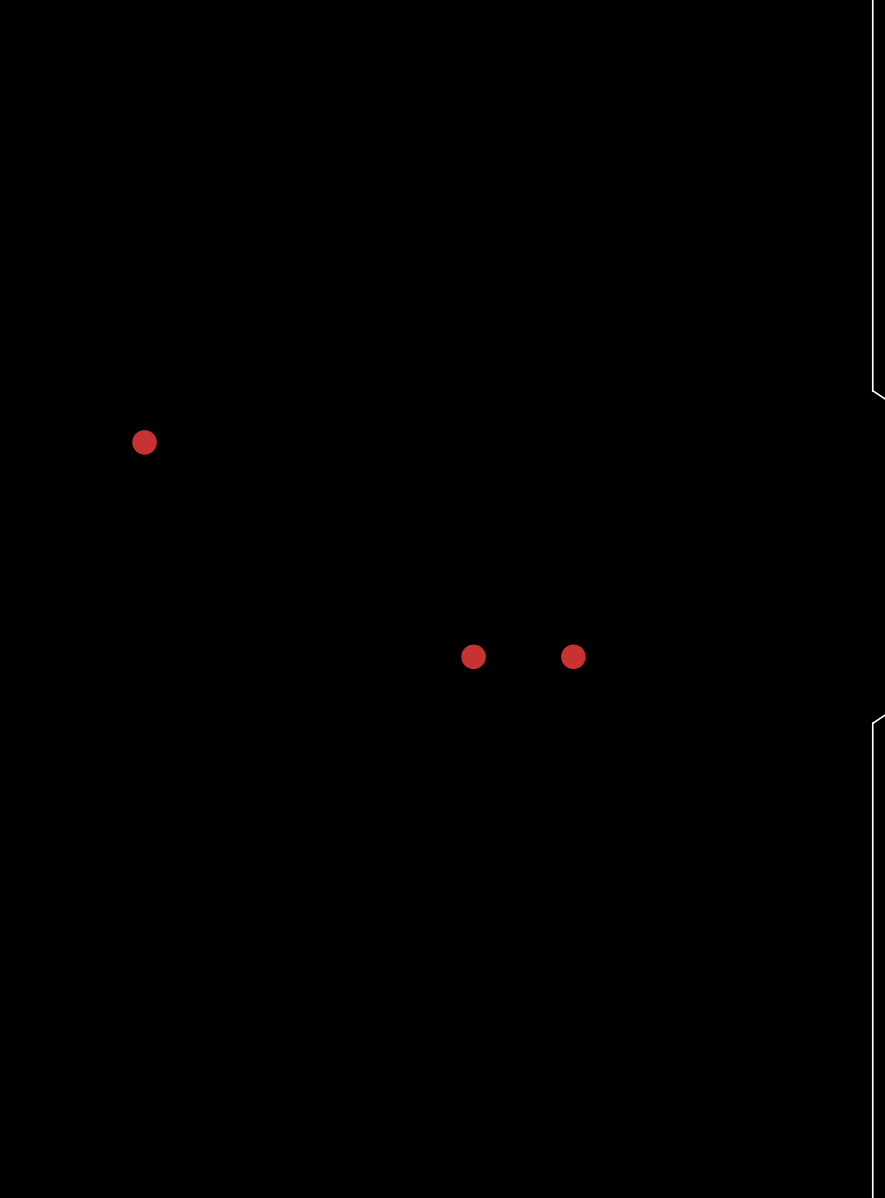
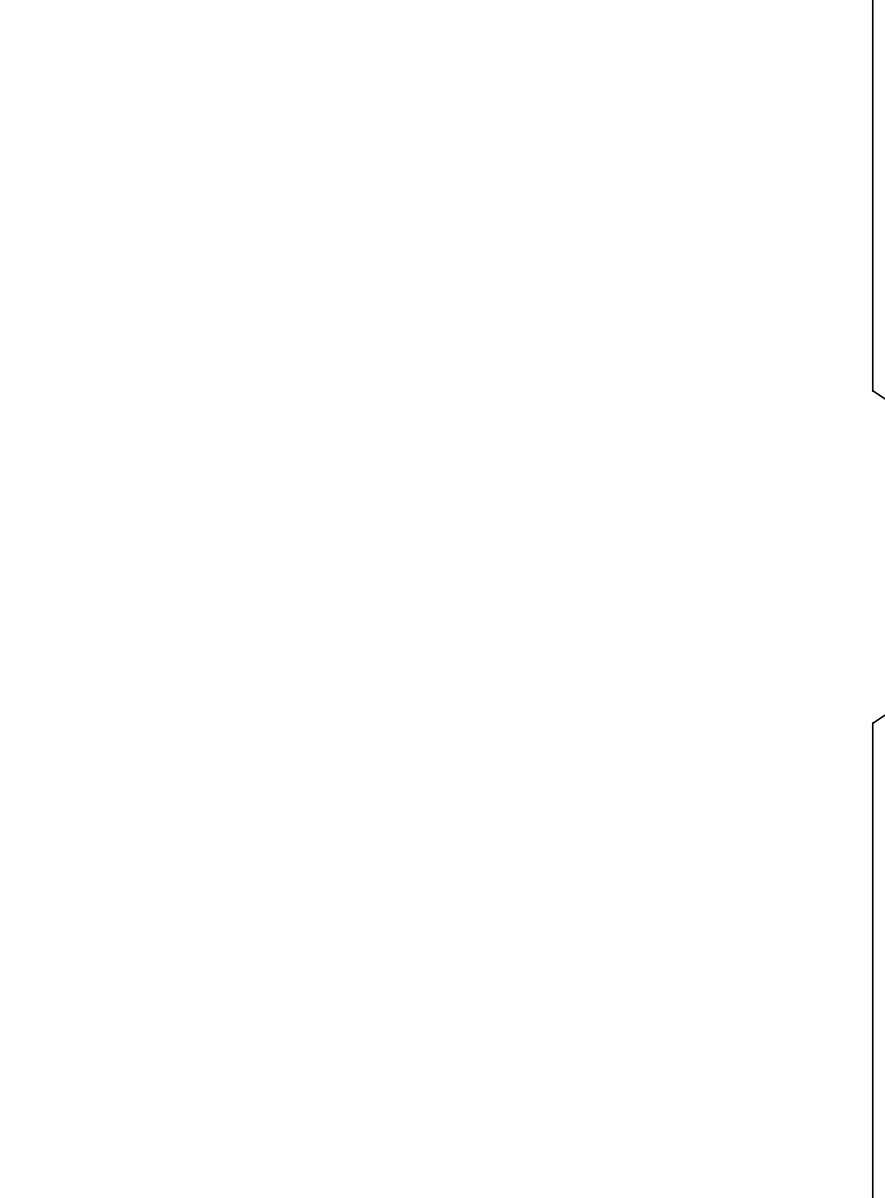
part: (144, 442) -> none
part: (473, 656) -> none
part: (573, 656) -> none

